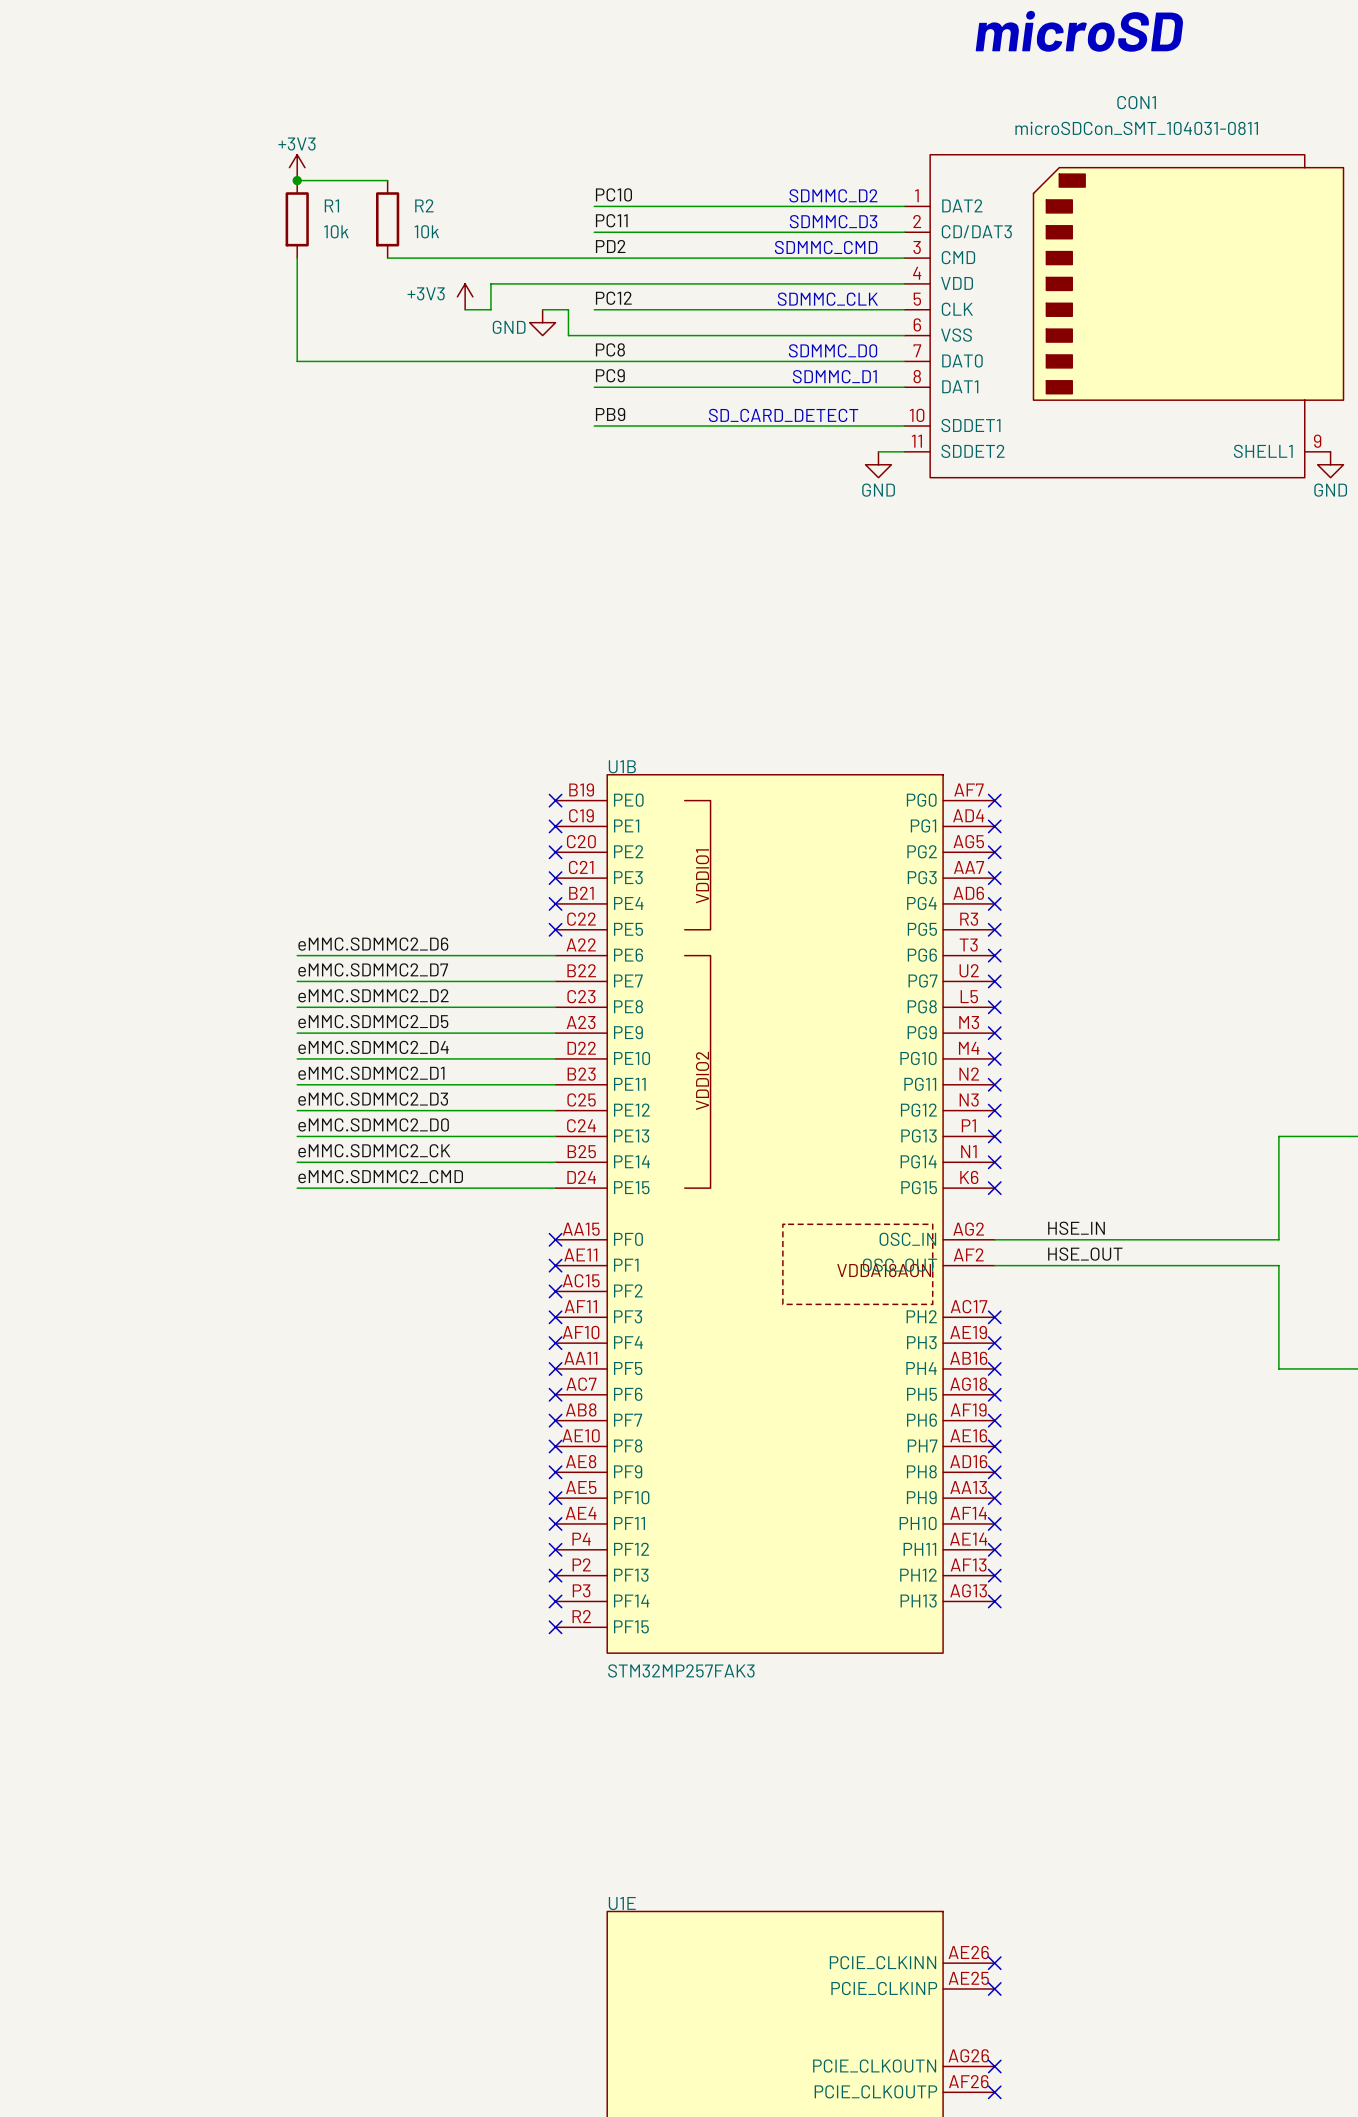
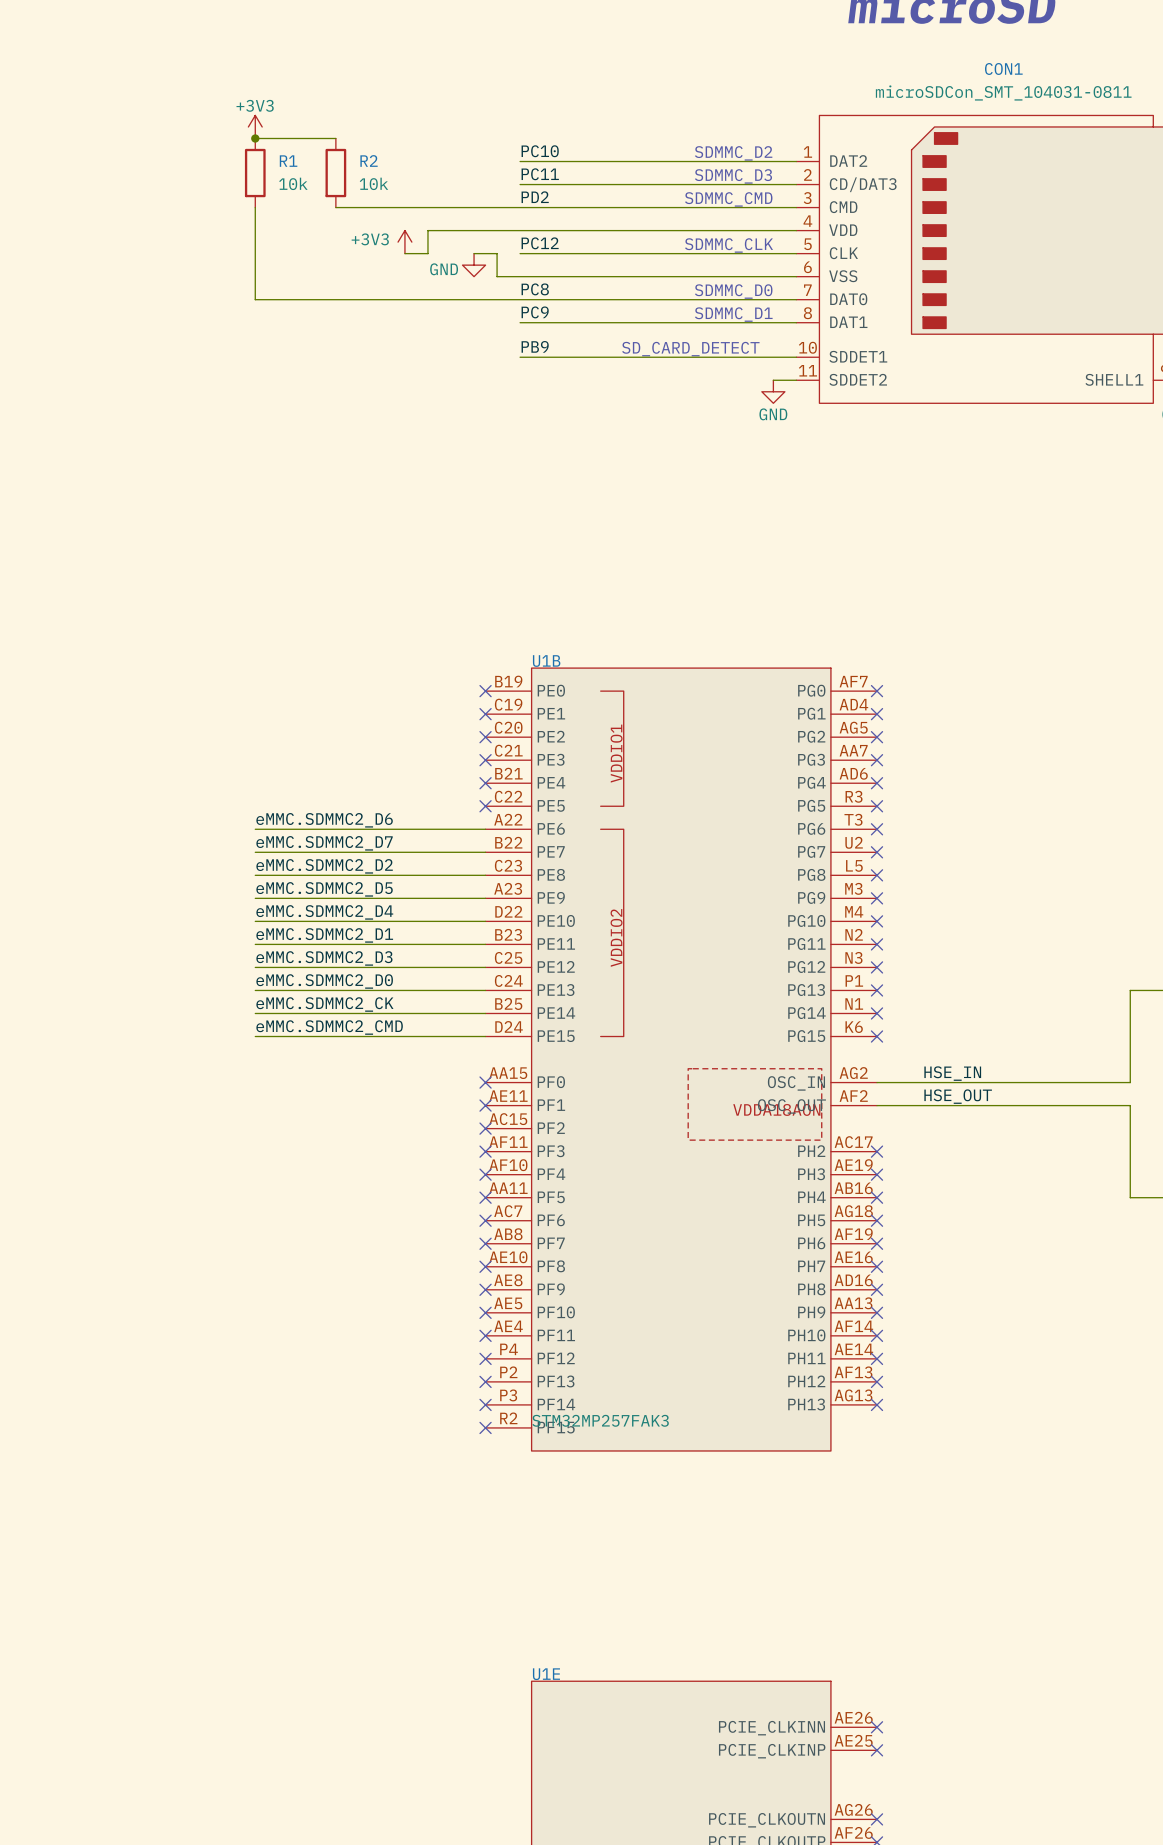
U1B value position: STM32MP257FAK3 (681, 1670) -> STM32MP257FAK3 (600, 1420)

